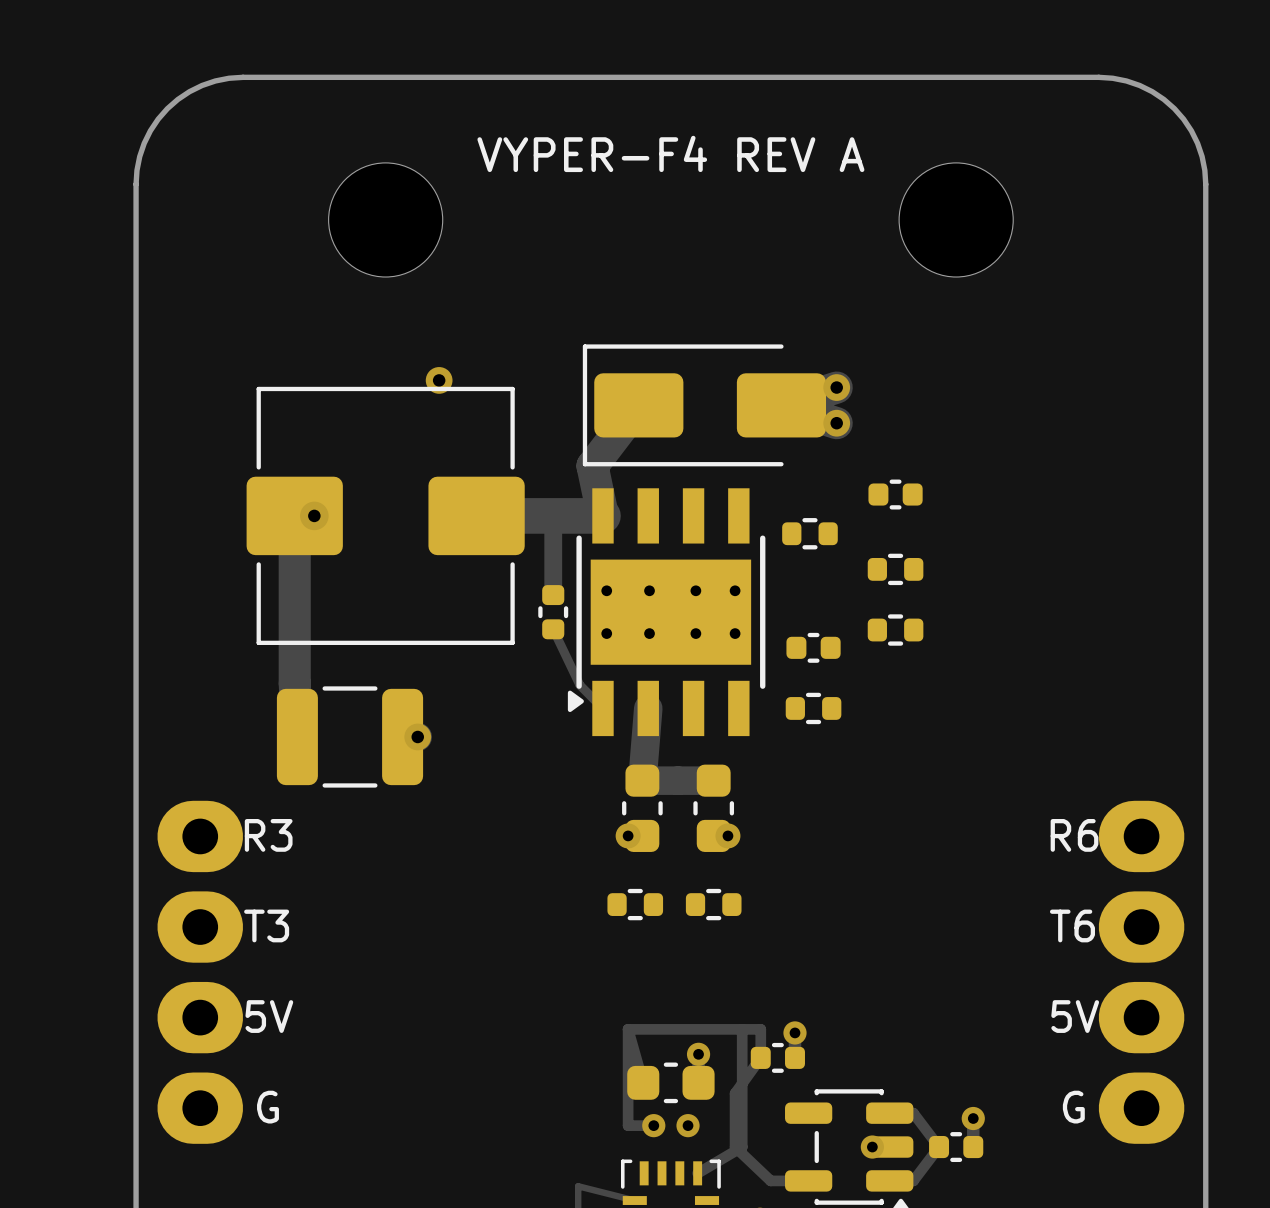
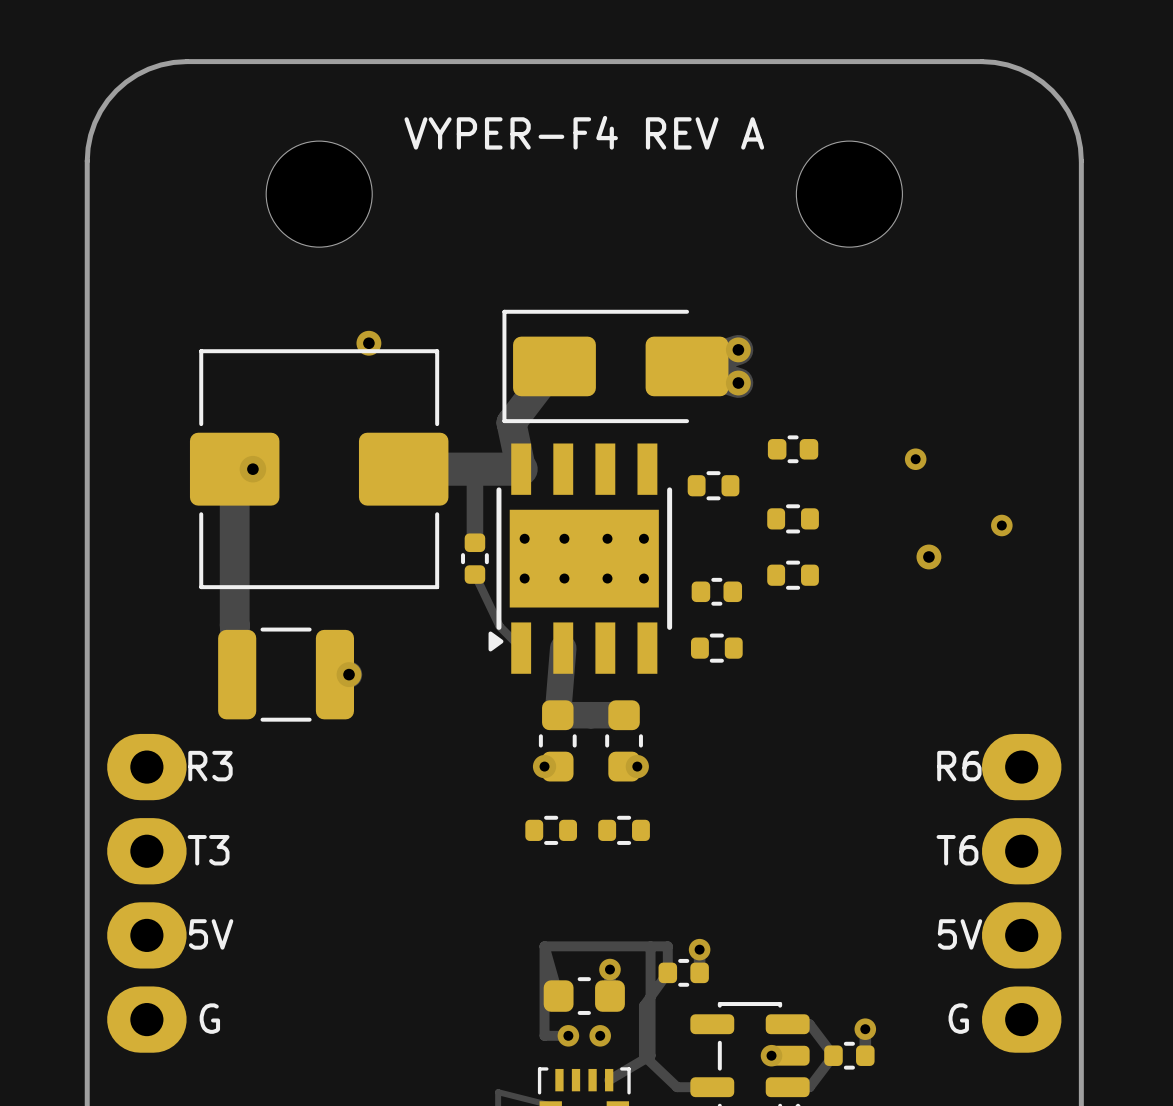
via: none -> (915, 459)
via: none -> (1001, 525)
via: none -> (928, 556)

